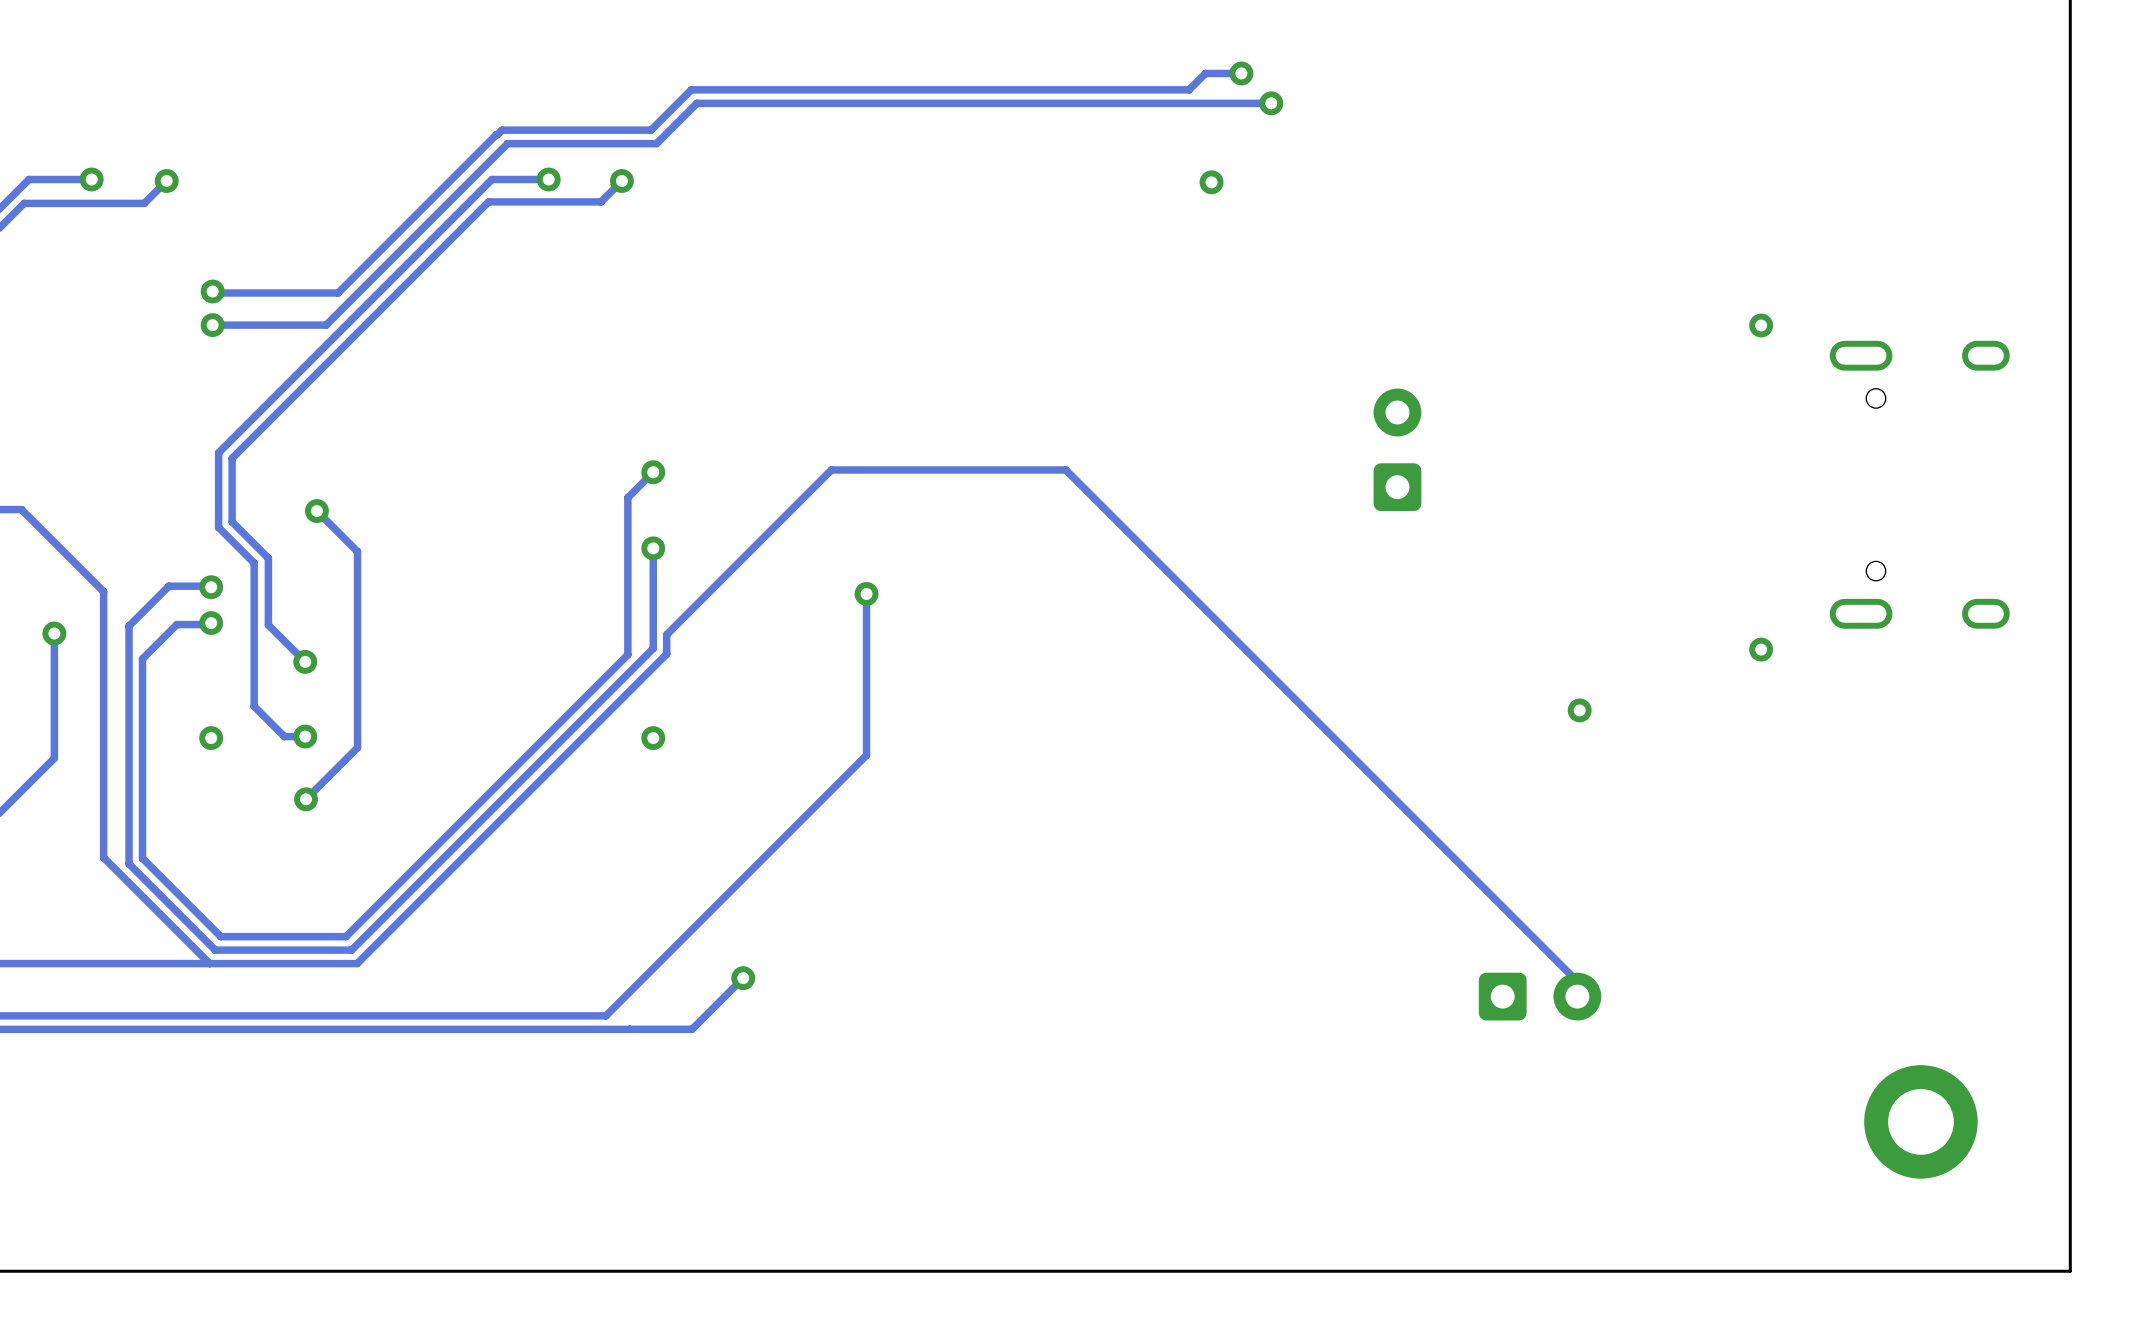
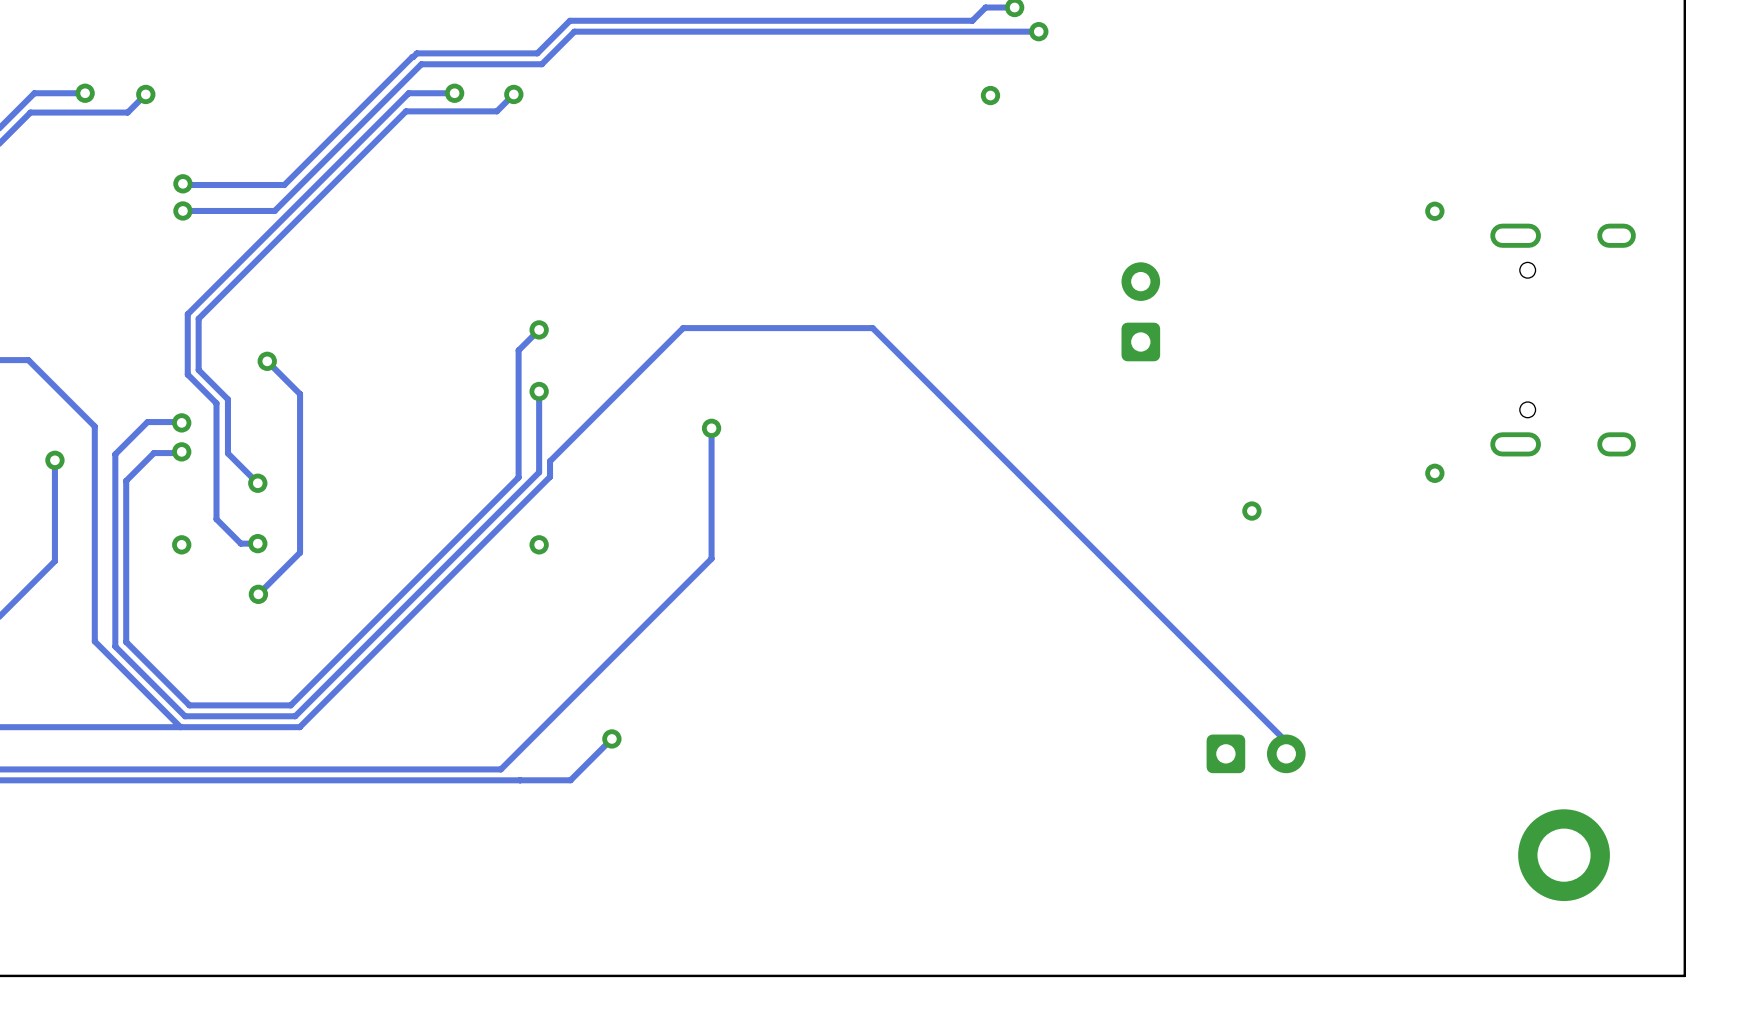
via position: (1579, 710) -> (1251, 511)

